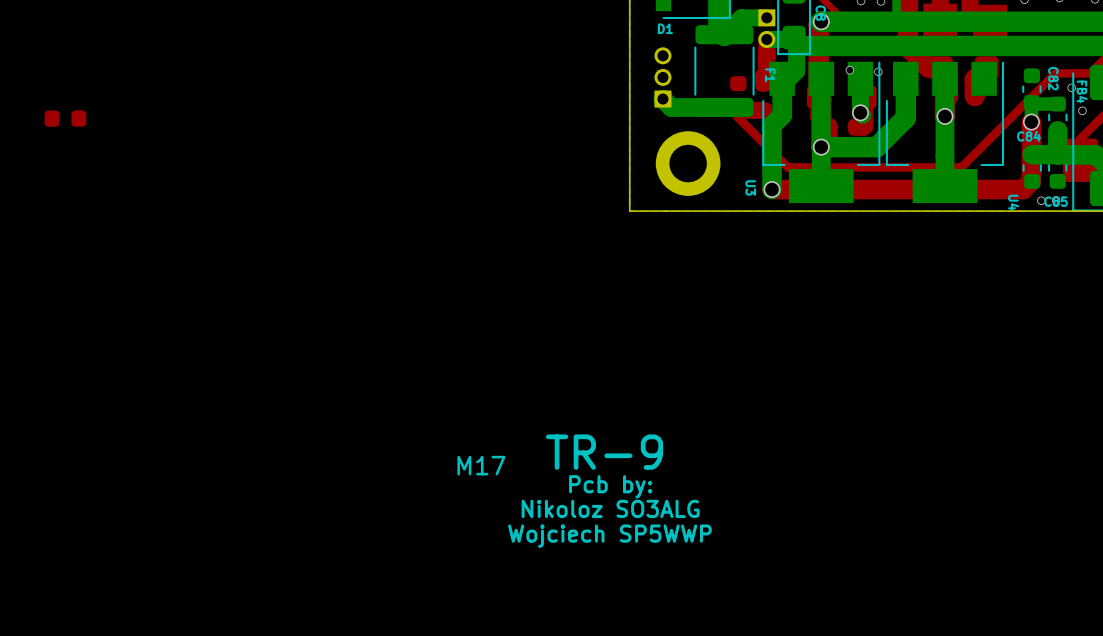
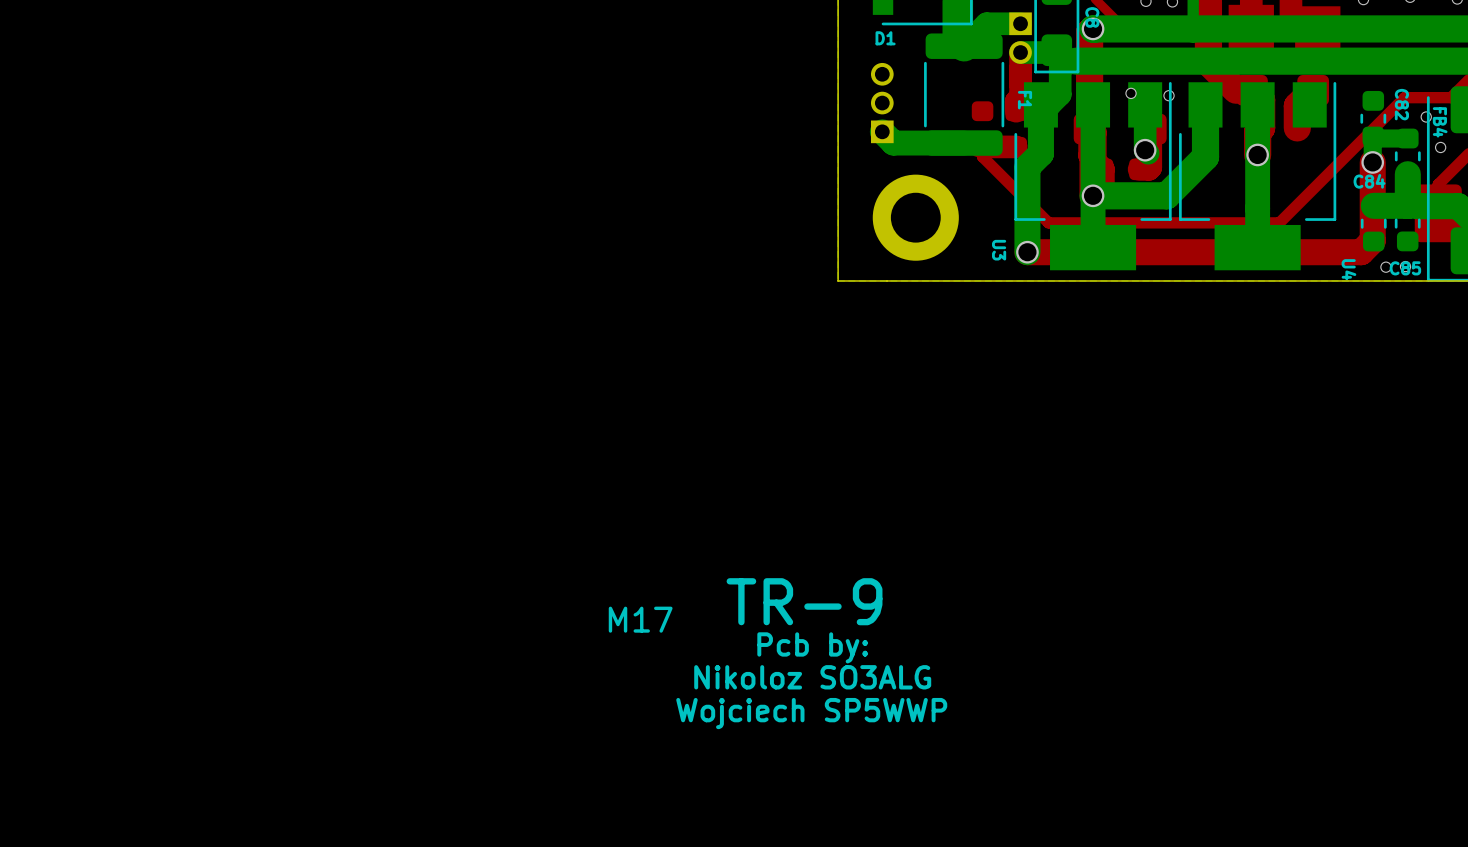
part: (65, 118) -> none

